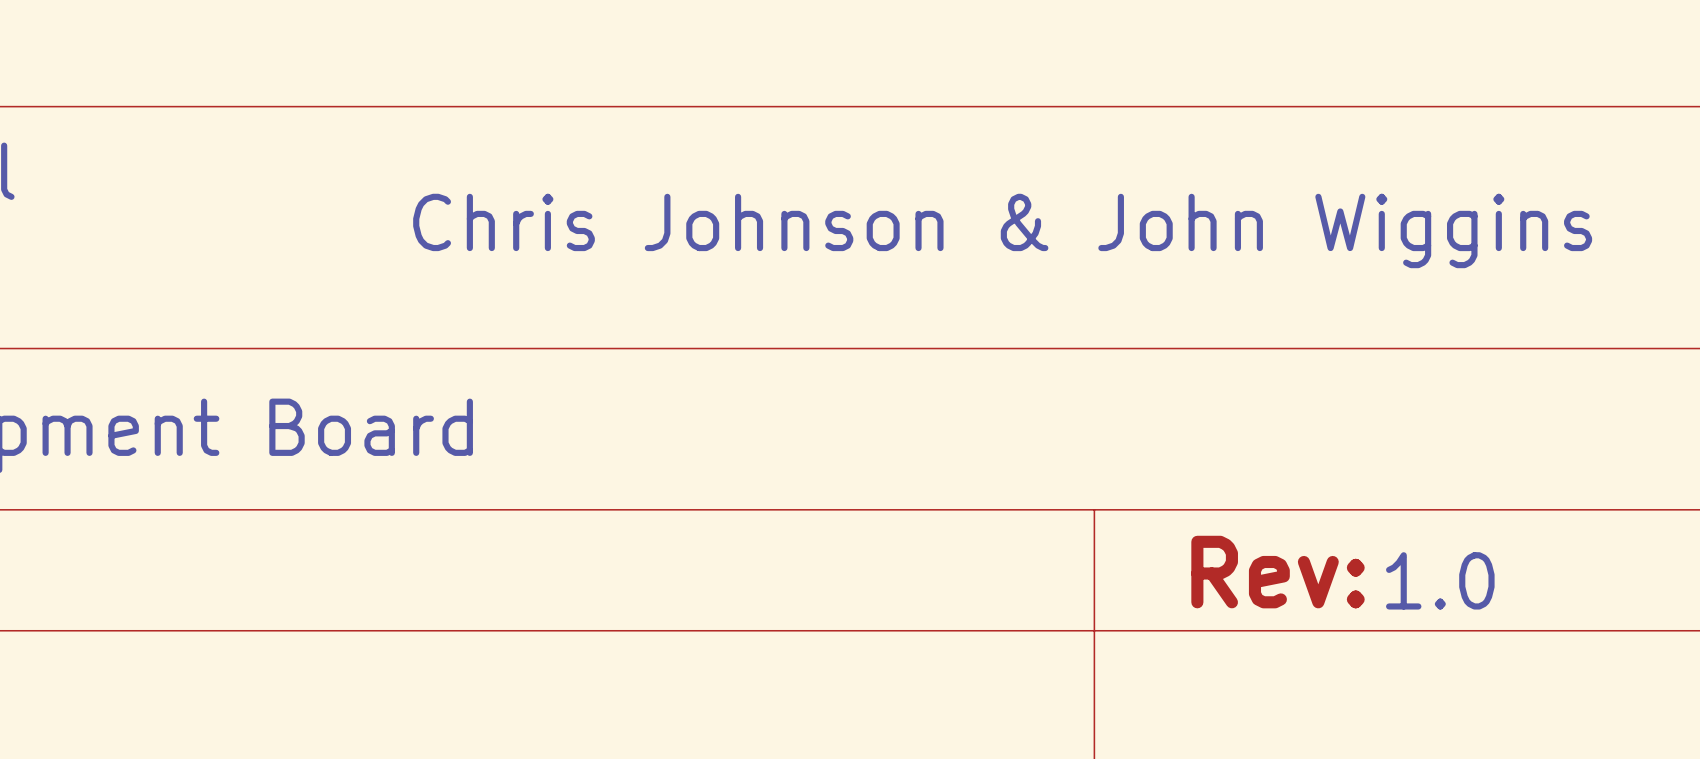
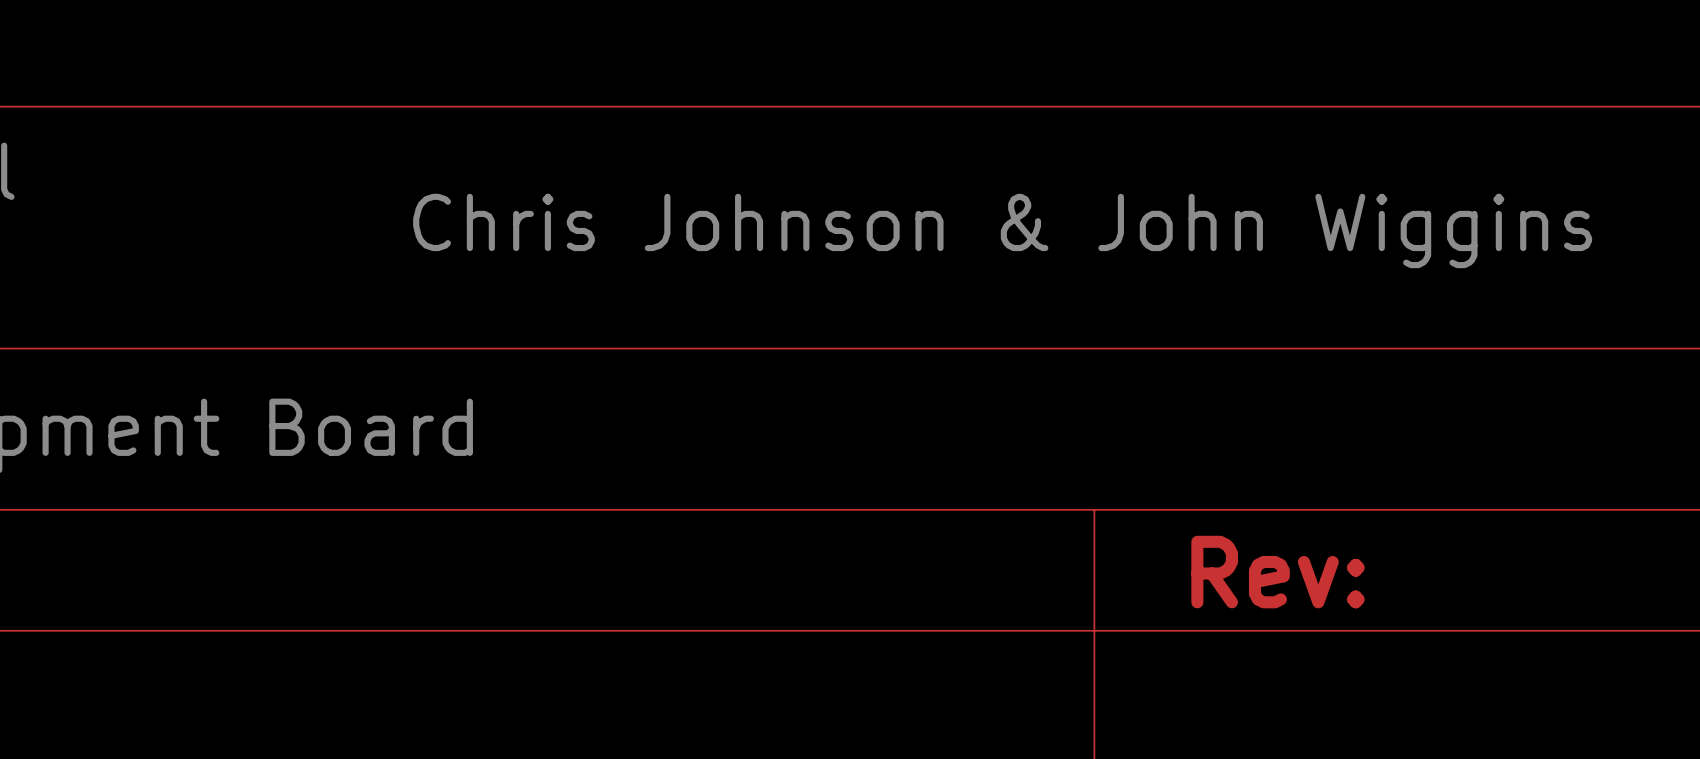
text: 1.0 (1440, 580) -> none

